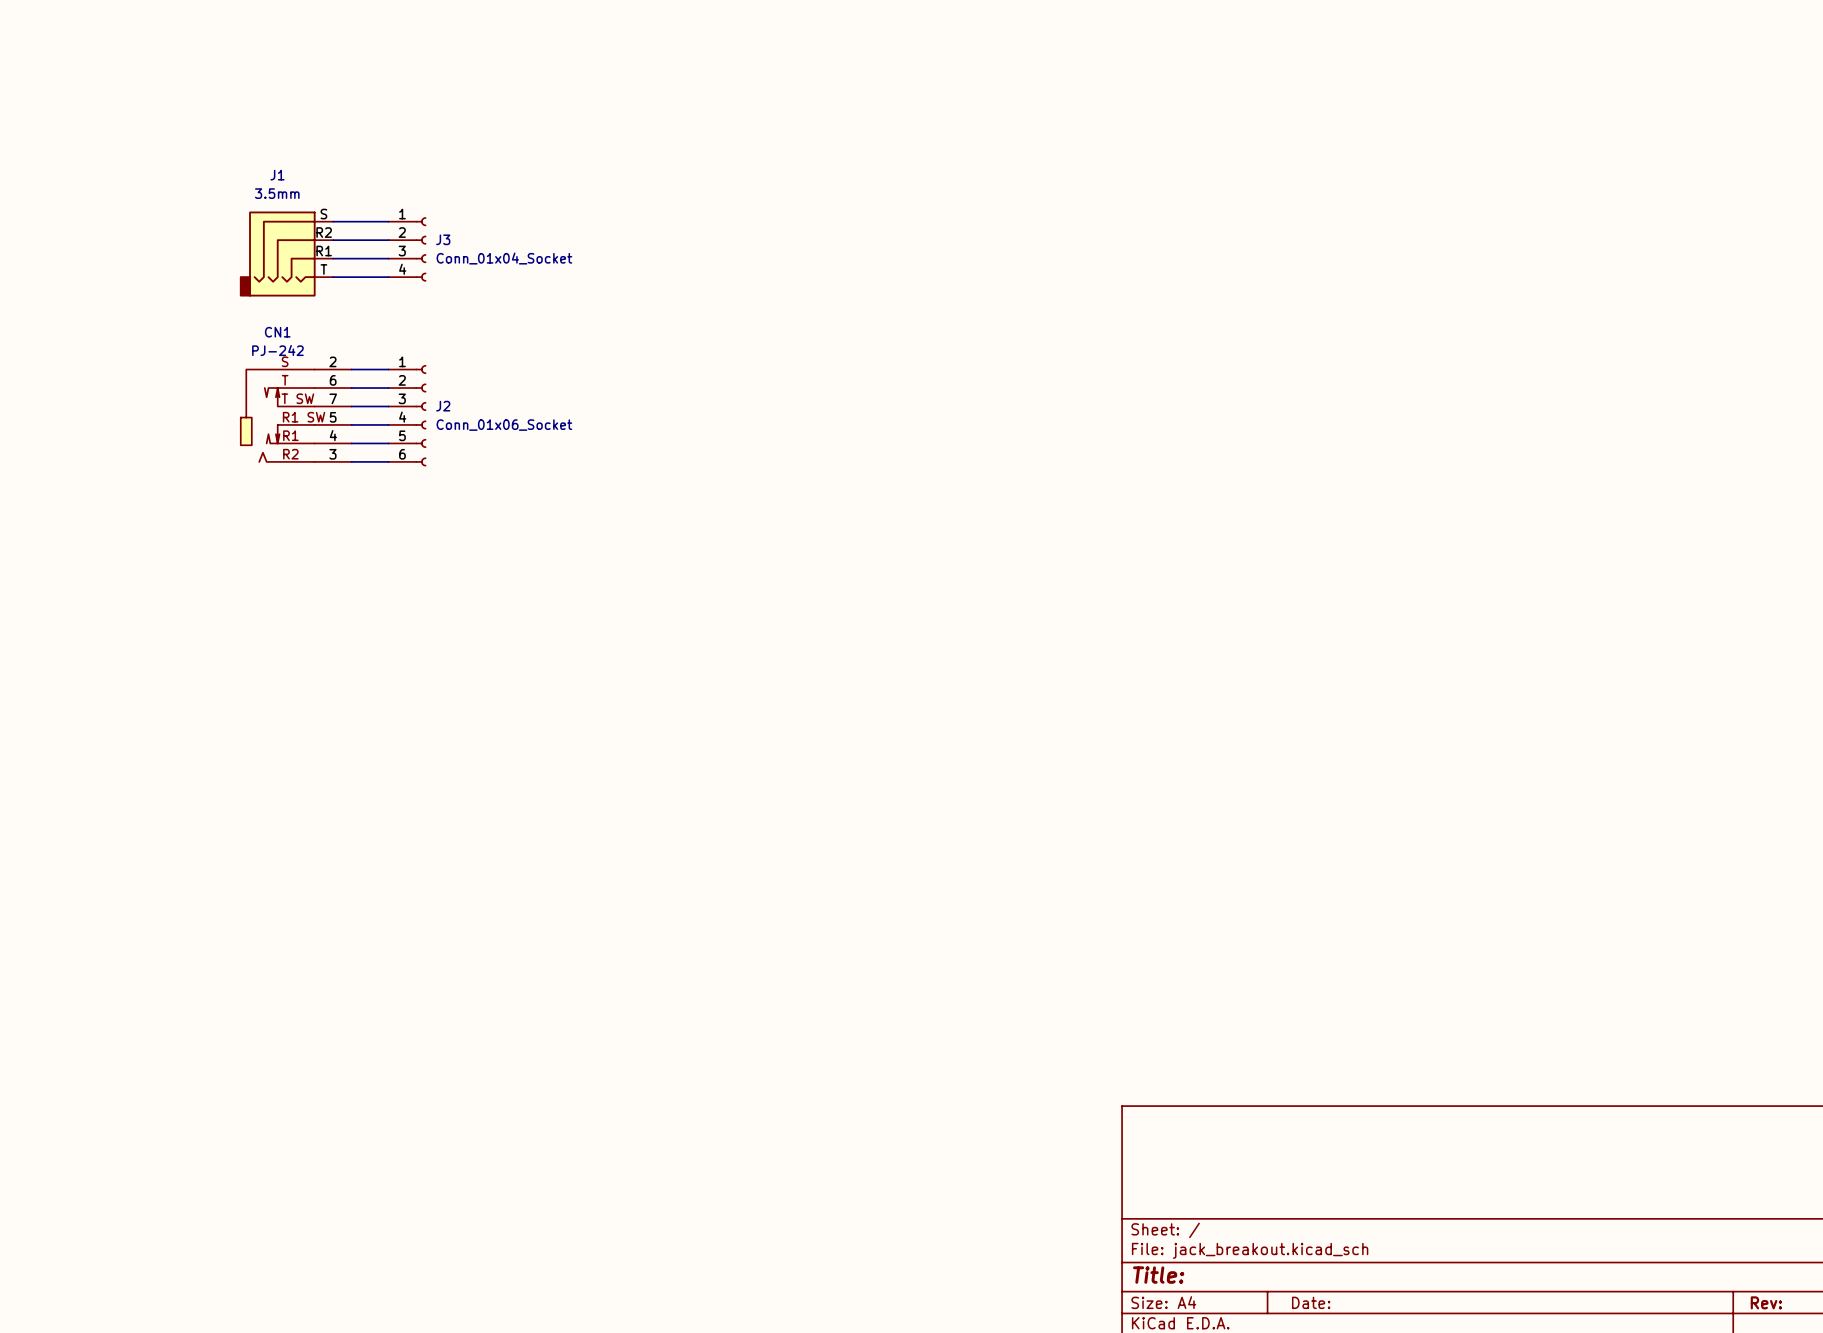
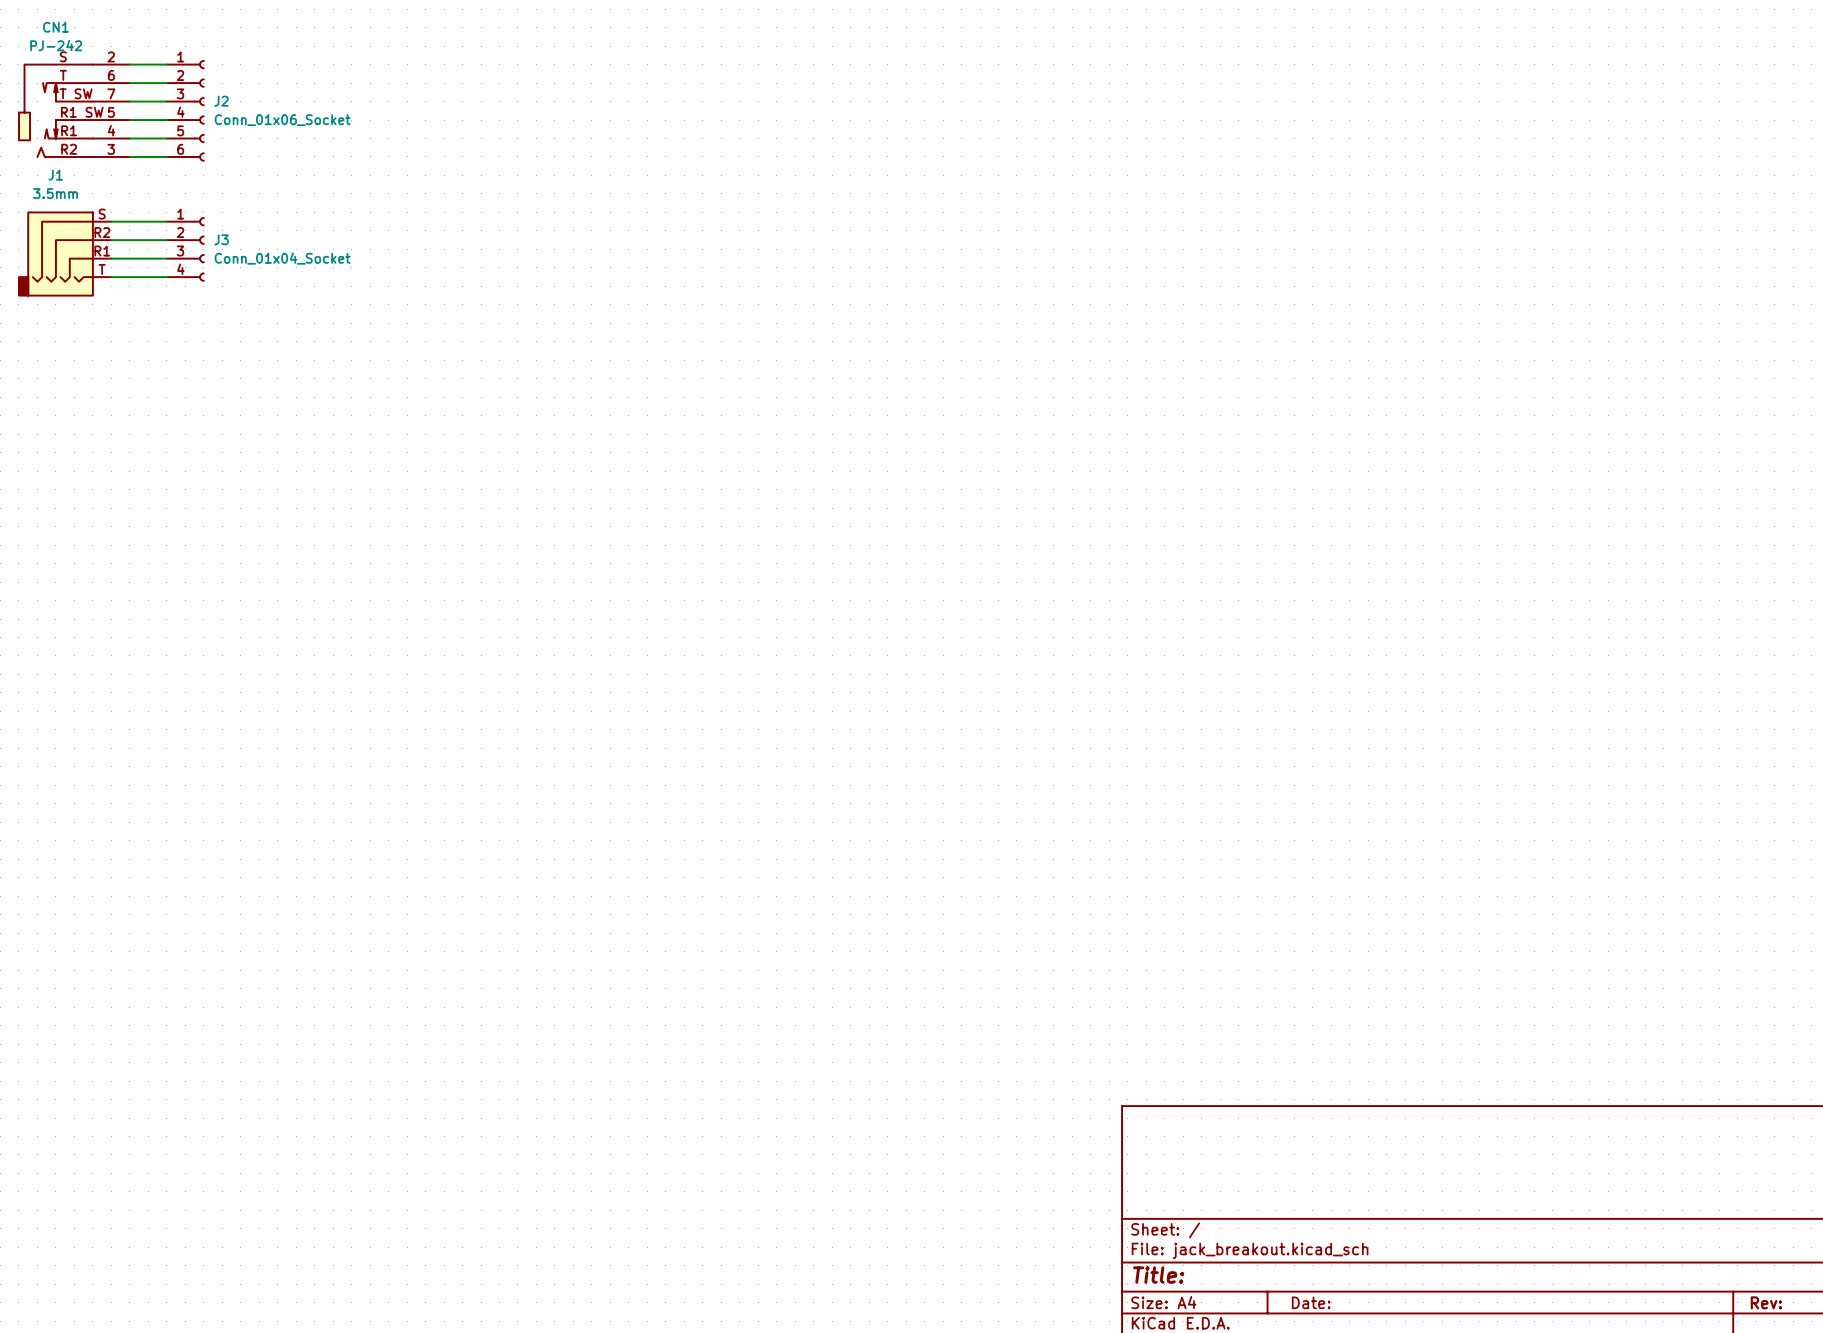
wire: none -> (129, 64) (166, 64)
wire: none -> (129, 83) (166, 83)
wire: none -> (129, 101) (166, 101)
wire: none -> (129, 120) (166, 120)
wire: none -> (129, 138) (166, 138)
wire: none -> (129, 156) (166, 156)
wire: none -> (111, 221) (166, 221)
wire: (333, 221) (388, 221) -> none
wire: none -> (111, 240) (166, 240)
wire: (333, 240) (388, 240) -> none
J3 position: (407, 249) -> (185, 249)
J1 position: (286, 254) -> (64, 254)
wire: none -> (111, 258) (166, 258)
wire: (333, 258) (388, 258) -> none
wire: none -> (111, 277) (166, 277)
wire: (333, 277) (388, 277) -> none
wire: (351, 369) (388, 369) -> none
wire: (351, 388) (388, 388) -> none
wire: (351, 406) (388, 406) -> none
CN1 position: (296, 415) -> (74, 110)
J2 position: (407, 415) -> (185, 110)
wire: (351, 424) (388, 424) -> none
wire: (351, 443) (388, 443) -> none
wire: (351, 461) (388, 461) -> none

